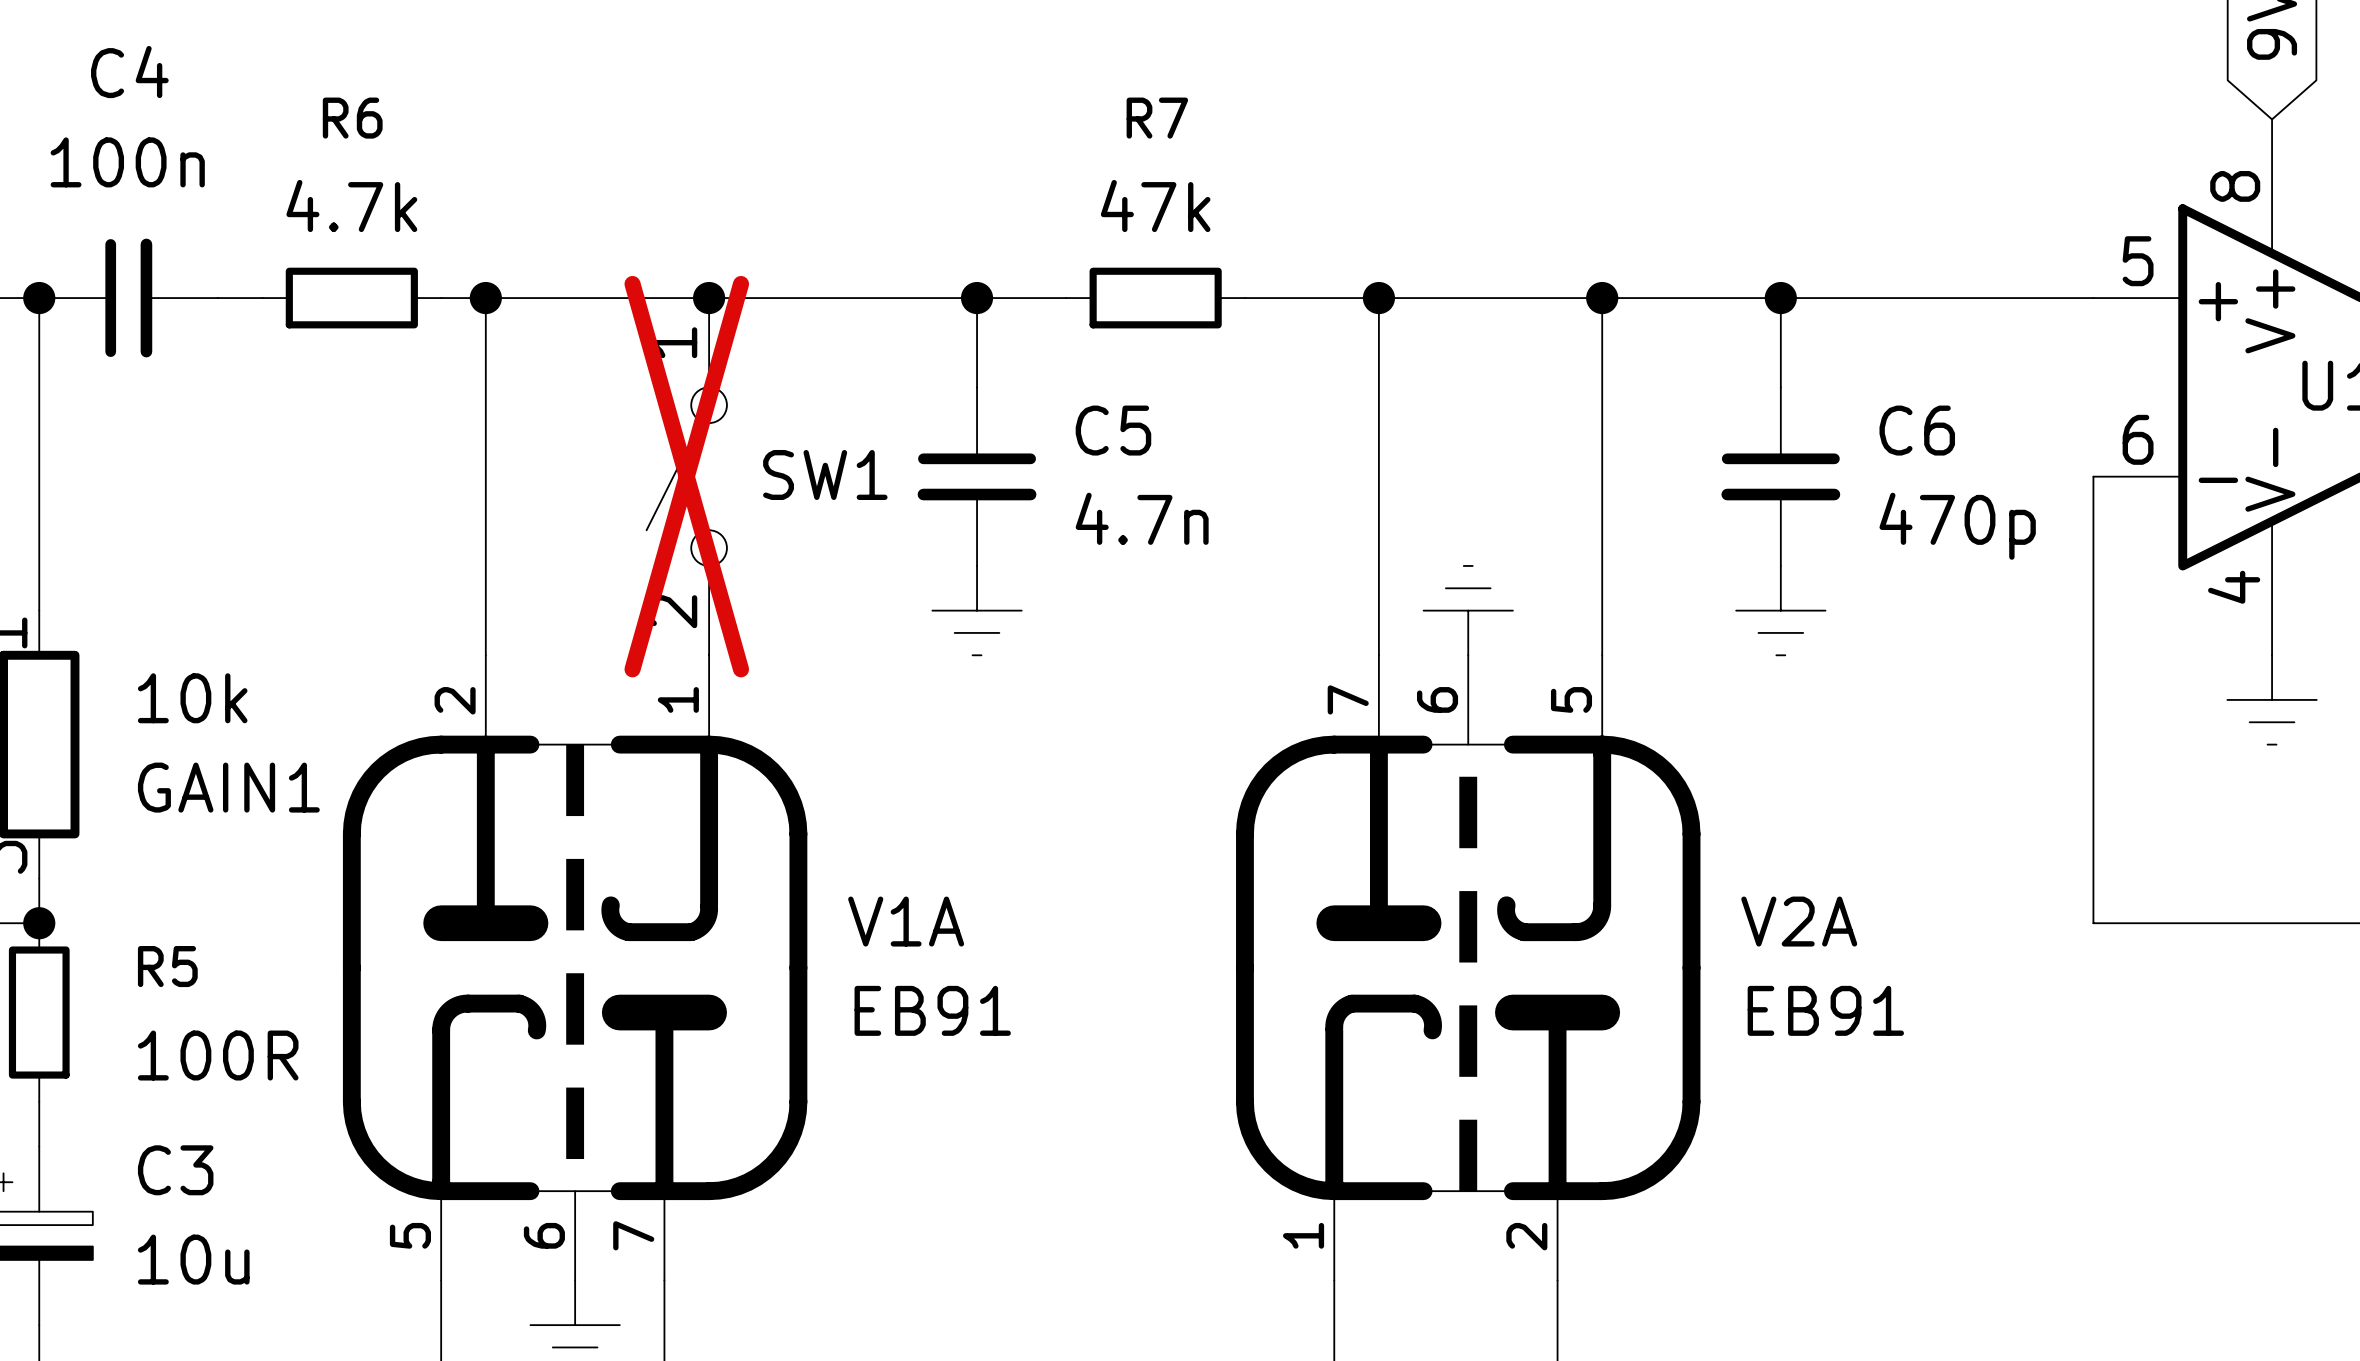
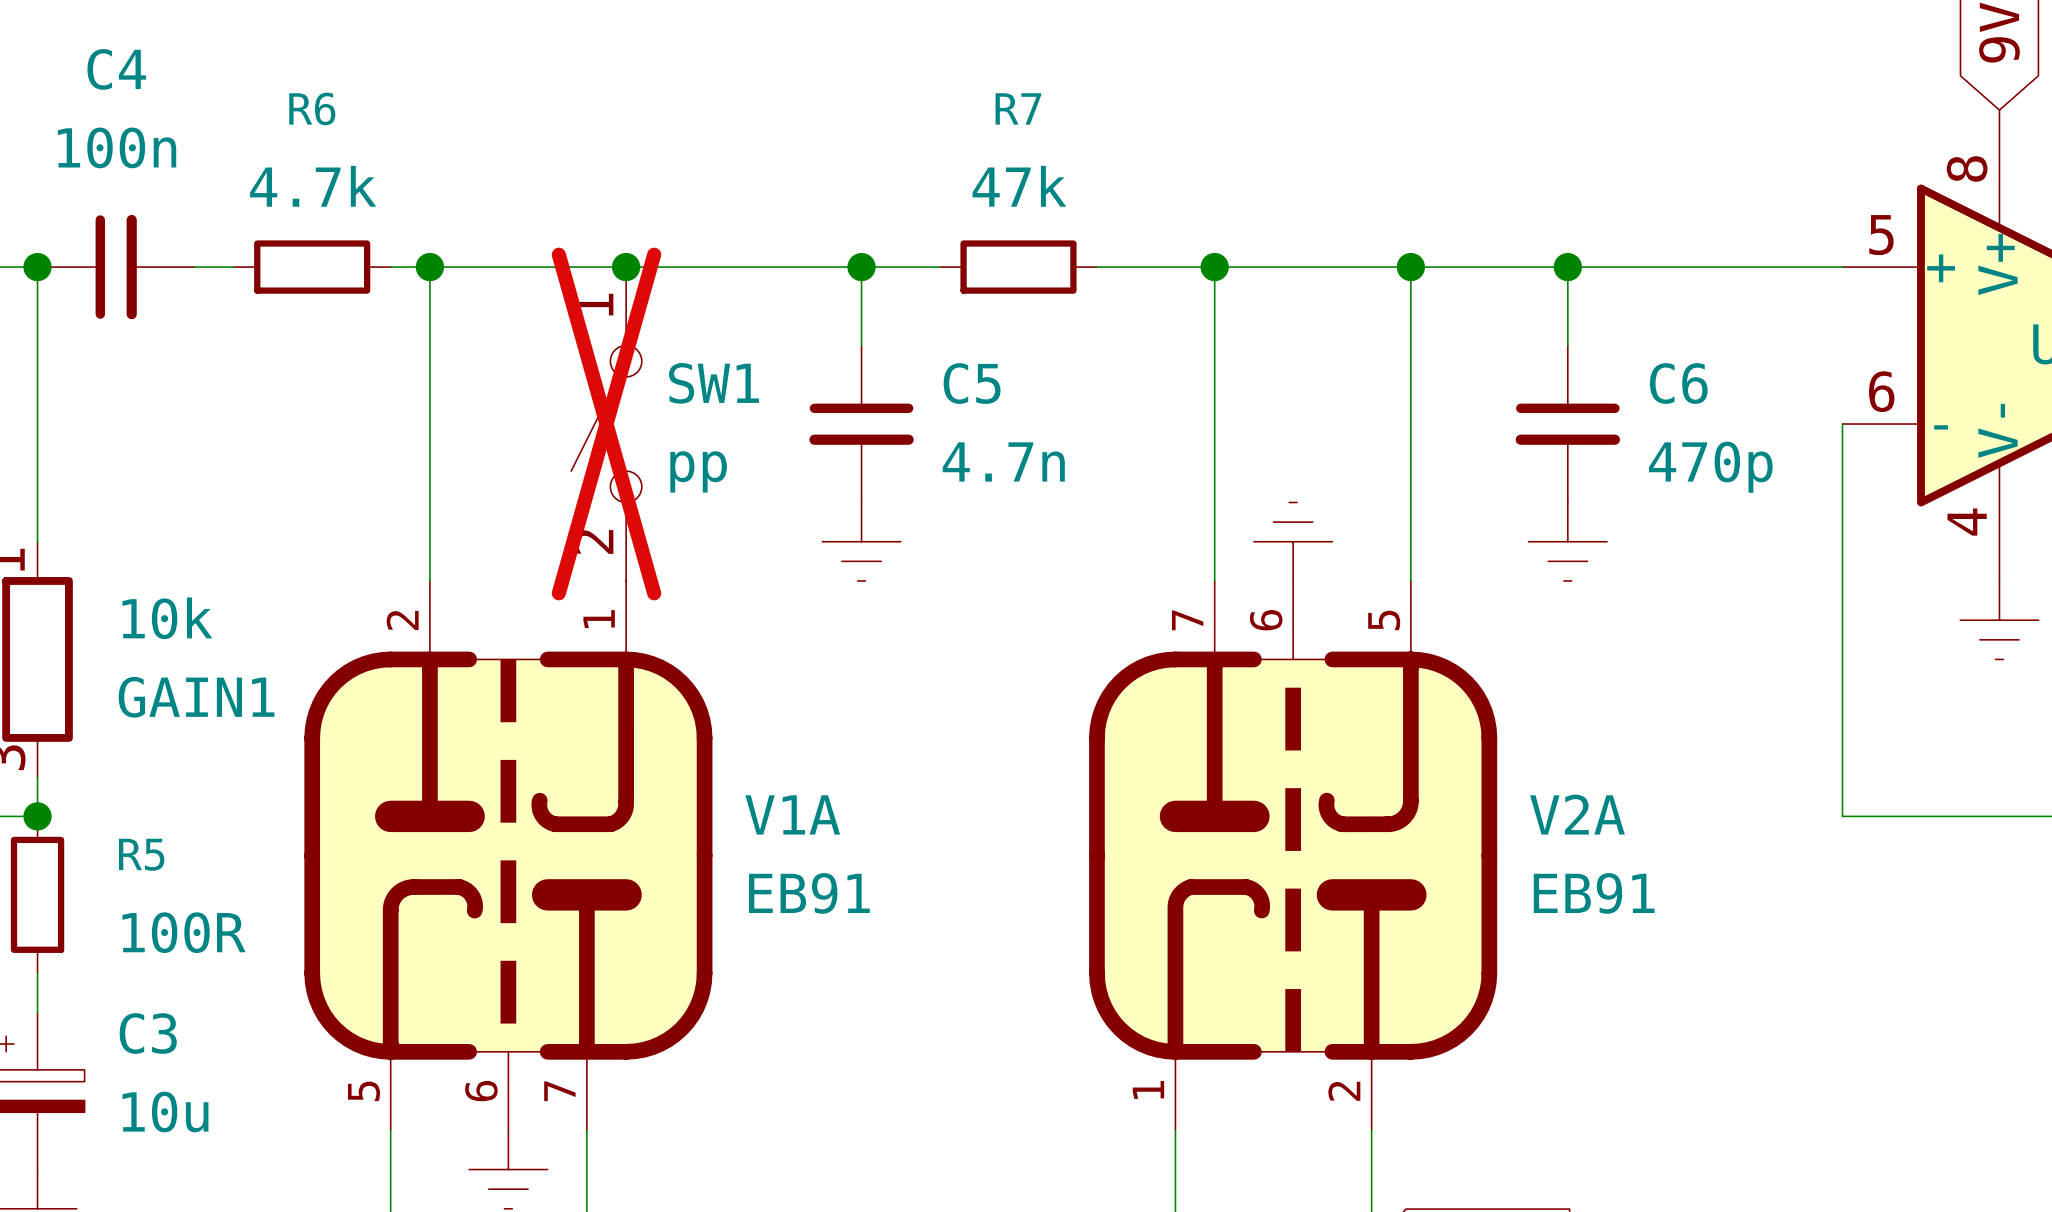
SW1 name position: SW1 (825, 474) -> SW1 (713, 383)
SW1 value: none -> pp (698, 471)

